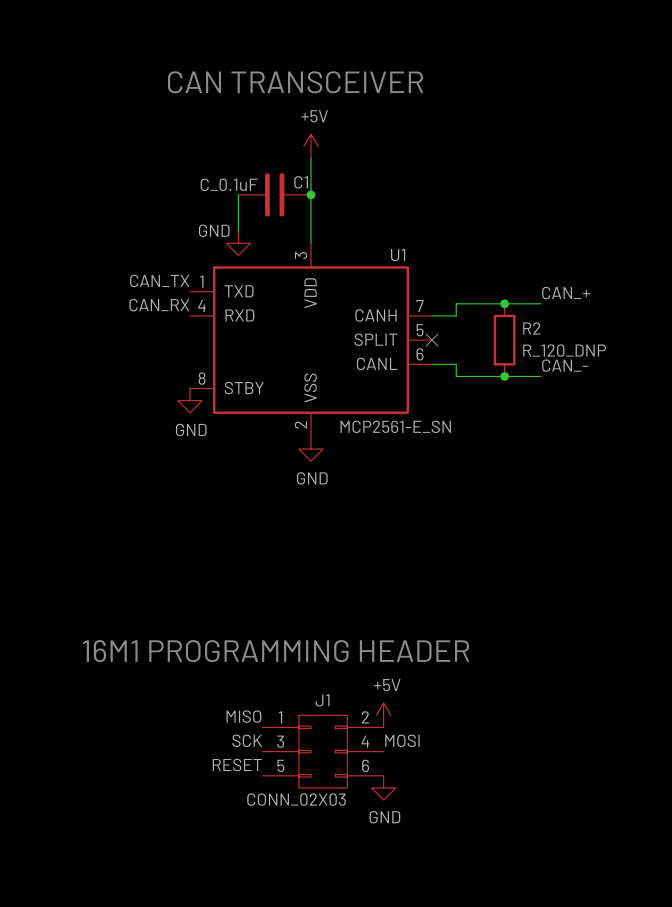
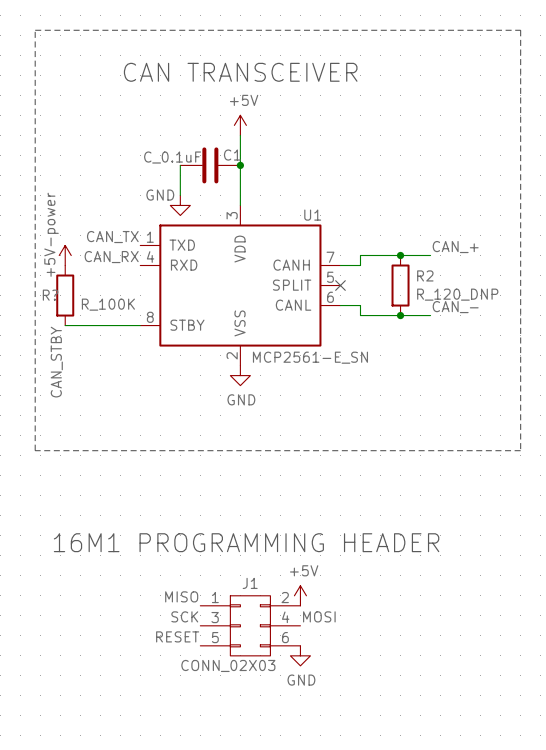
line: none -> (35, 30) (520, 30) (520, 450) (35, 450) (35, 30)
power symbol: none -> +5V-power (65, 255)
R?: none -> R_100K (65, 295)
wire: none -> (65, 325) (140, 325)
power symbol: GND (189, 400) -> none
label: none -> CAN_STBY (56, 362)

